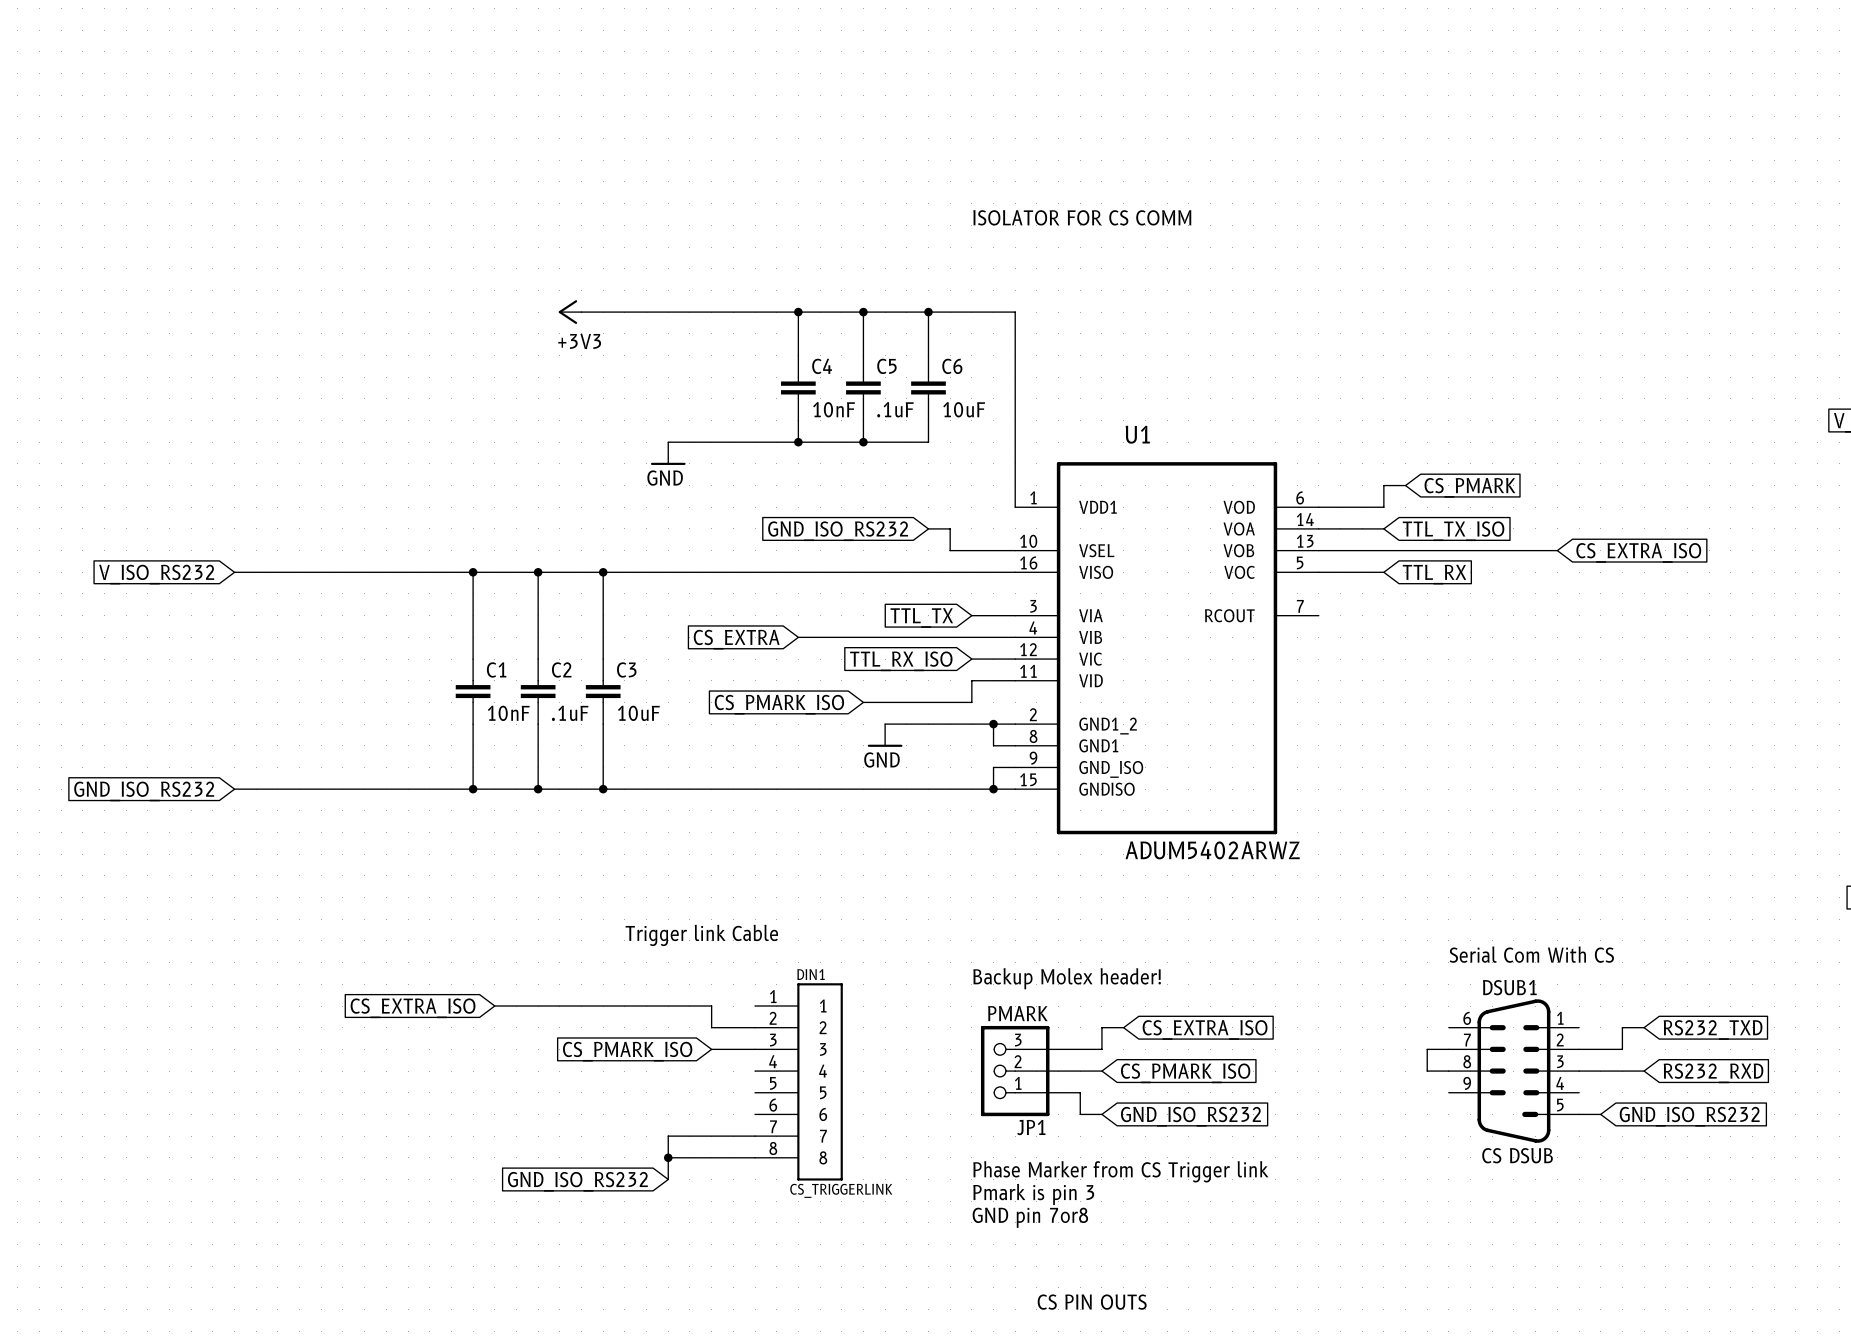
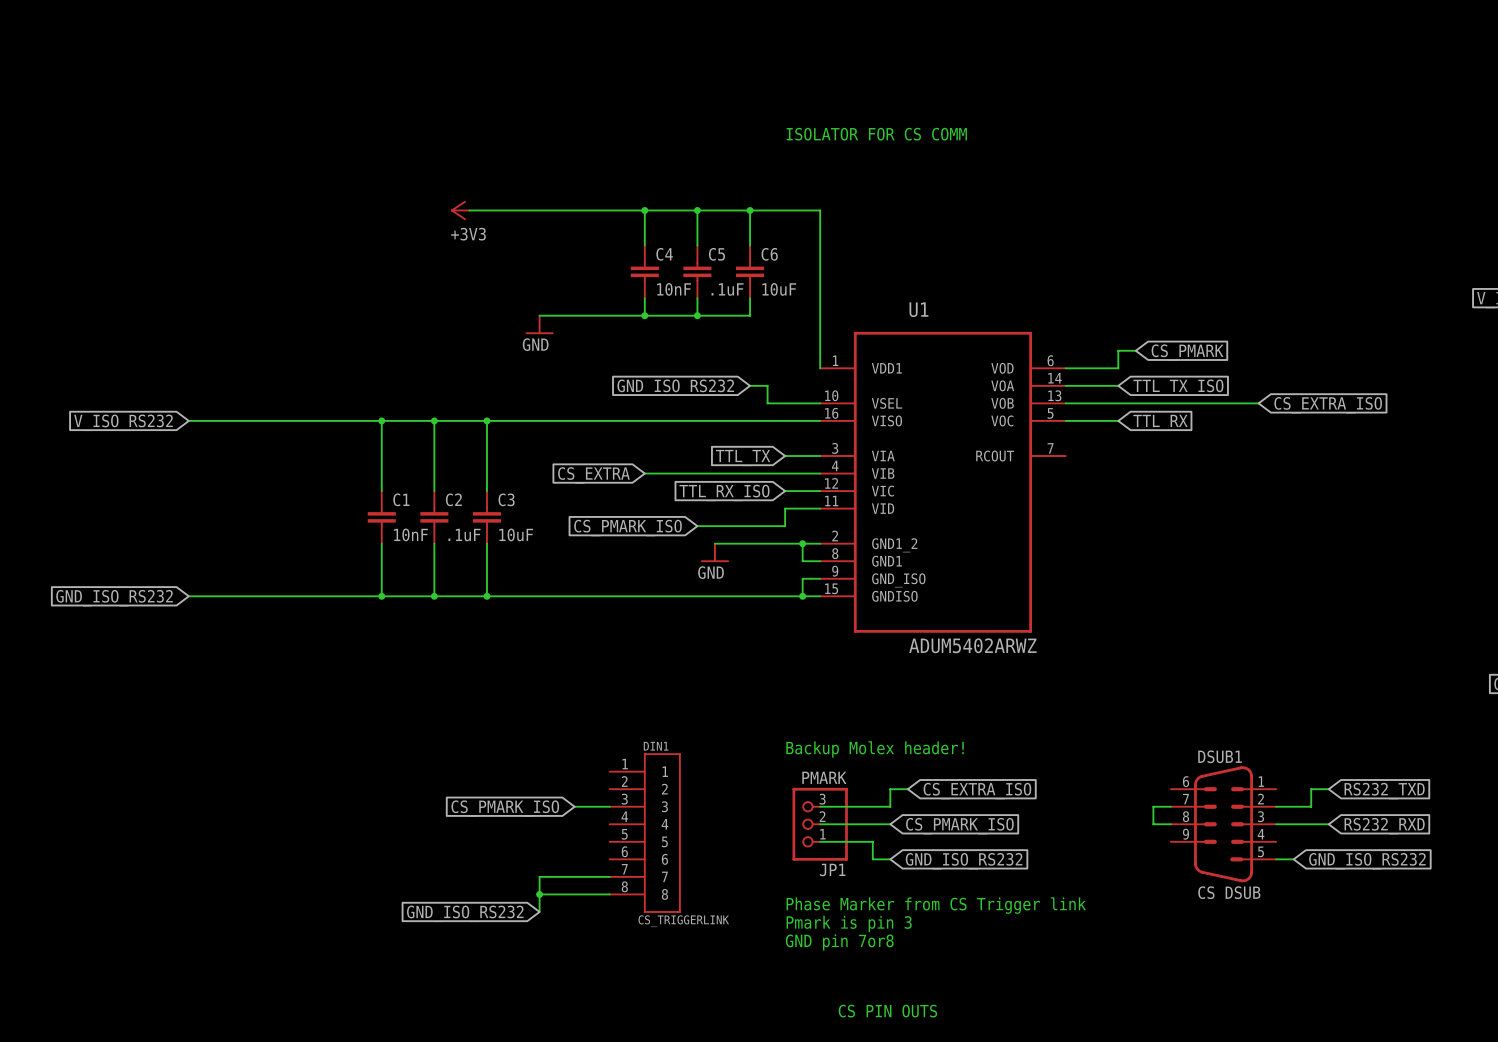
text: Trigger link Cable (701, 935) -> none
text: Serial Com With CS (1531, 954) -> none
wire: (494, 1006) (711, 1006) (711, 1027) (755, 1027) -> none
global label: CS_EXTRA_ISO (413, 1008) -> none

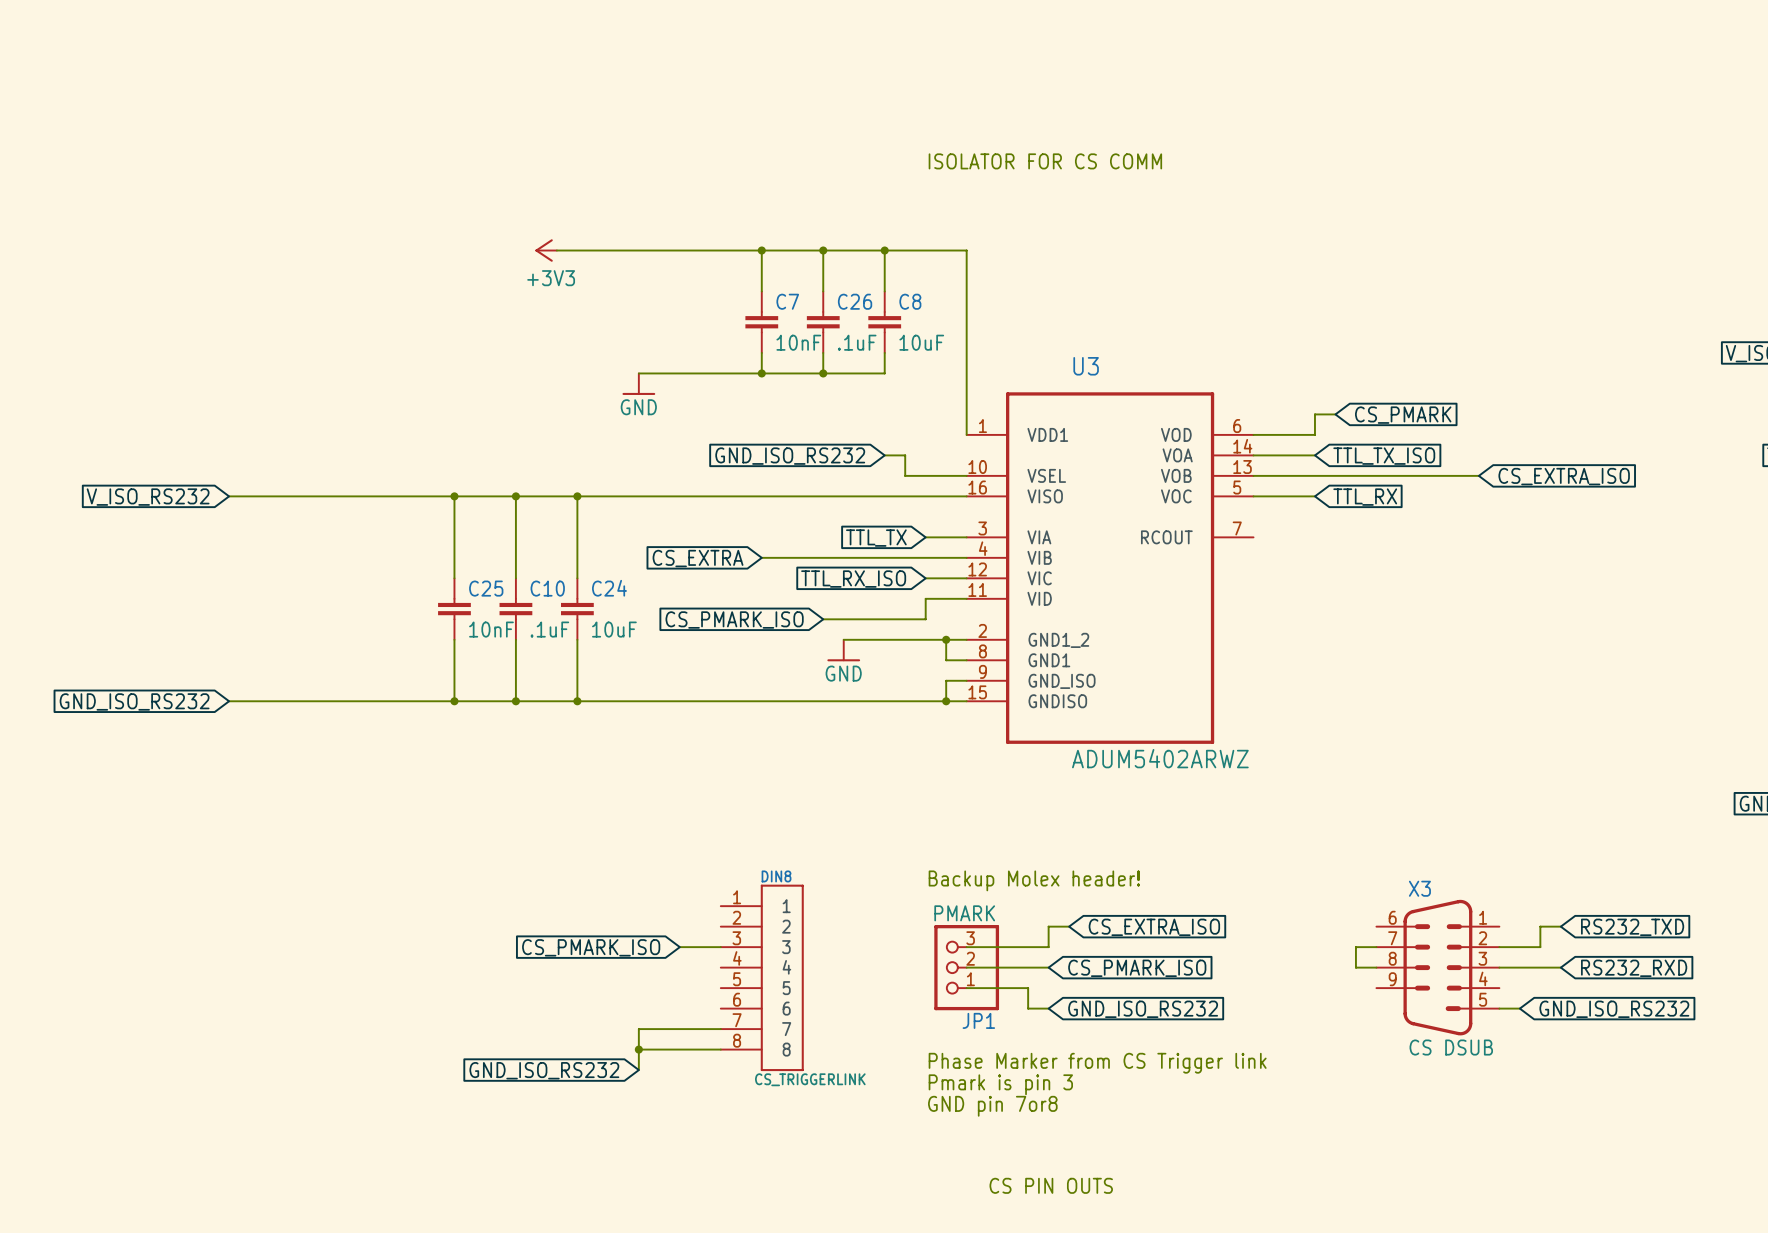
C4 name: C4 (664, 254) -> C7 (787, 301)
C5 name: C5 (716, 254) -> C26 (855, 301)
C6 name: C6 (769, 254) -> C8 (910, 301)
U1 name: U1 (918, 309) -> U3 (1086, 366)
C1 name: C1 (401, 499) -> C25 (486, 588)
C2 name: C2 (453, 499) -> C10 (547, 588)
C3 name: C3 (506, 499) -> C24 (609, 588)
DIN1 name: DIN1 (656, 746) -> DIN8 (776, 876)
DSUB1 name: DSUB1 (1220, 756) -> X3 (1419, 888)

